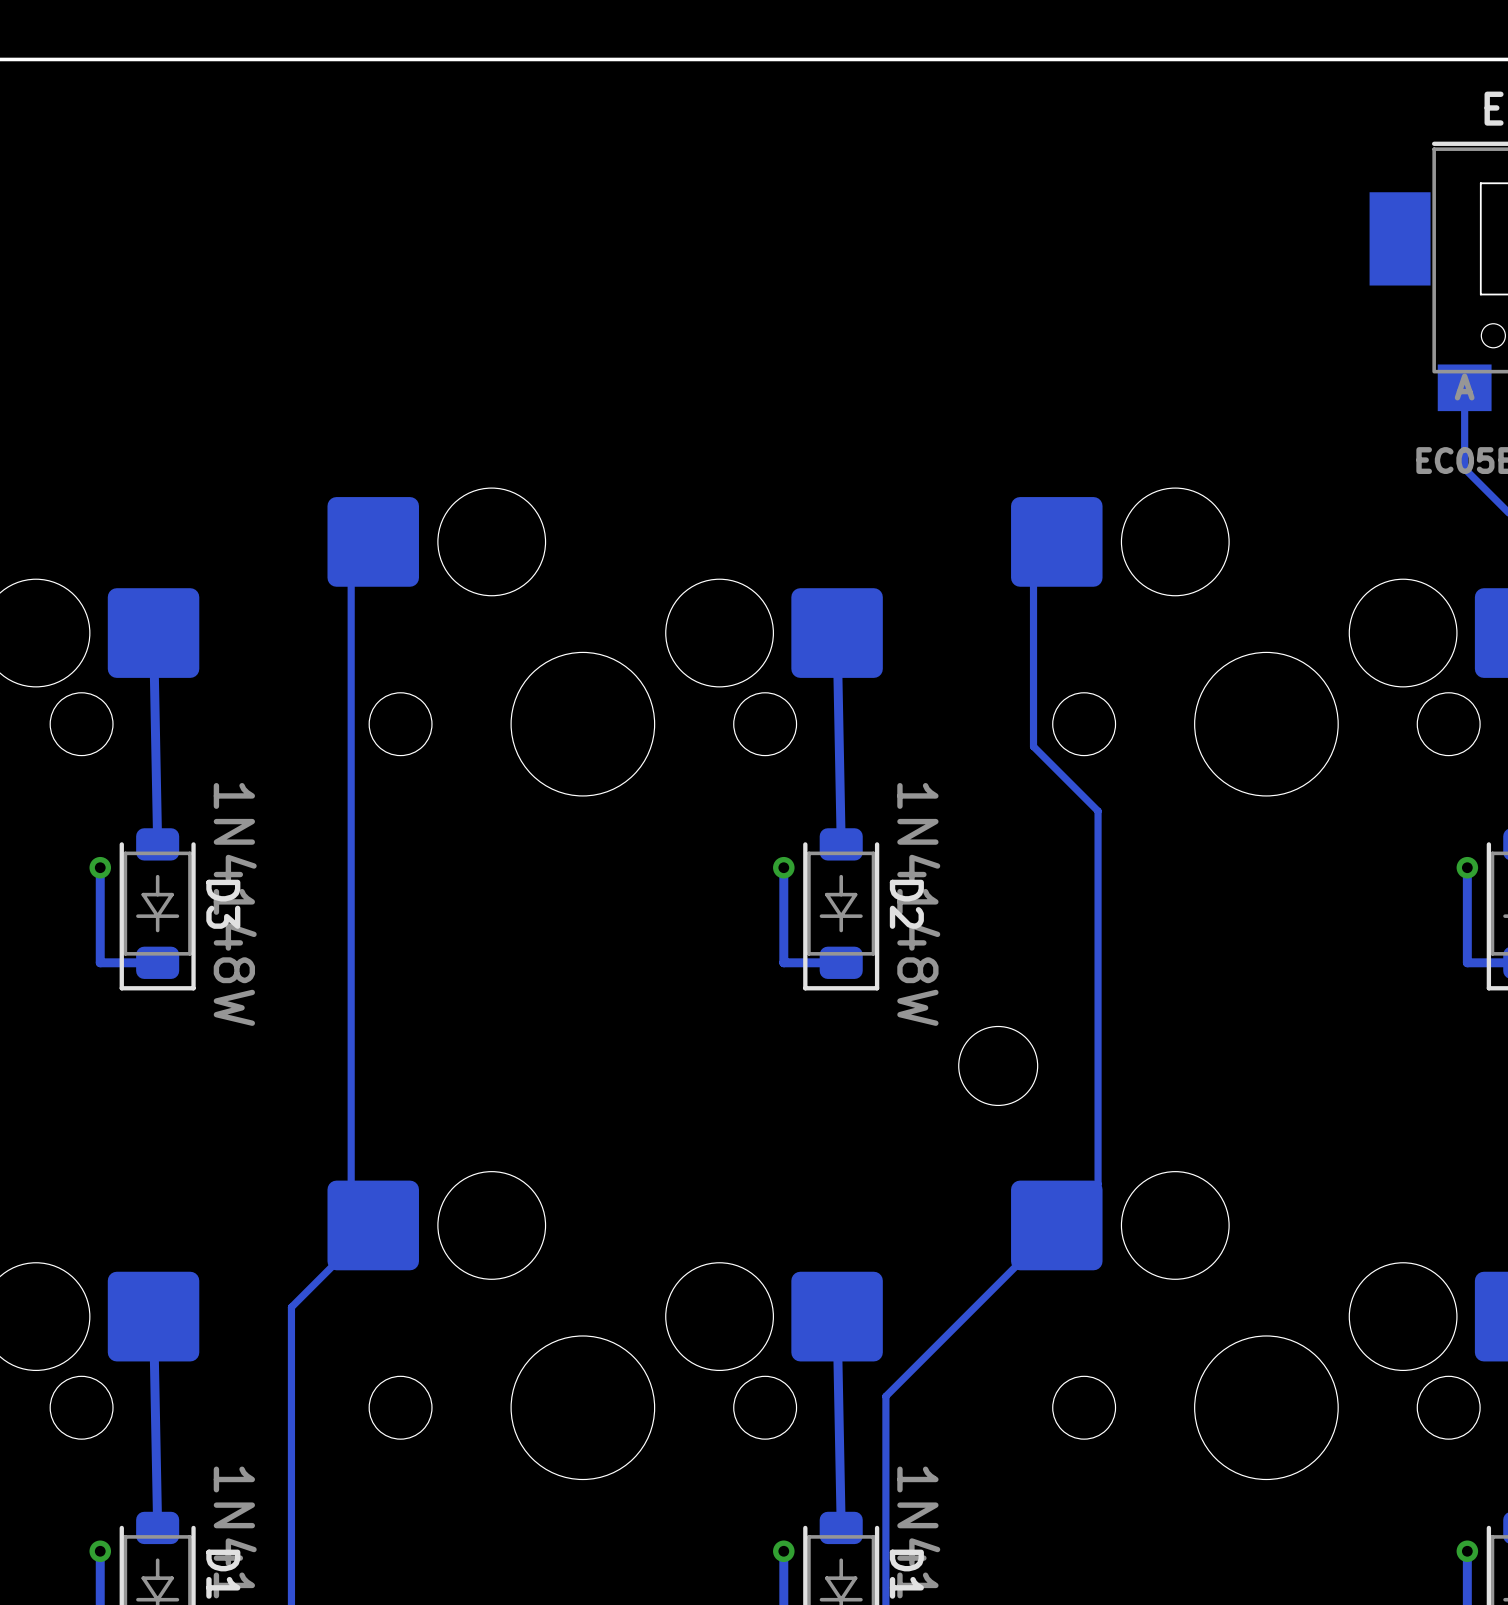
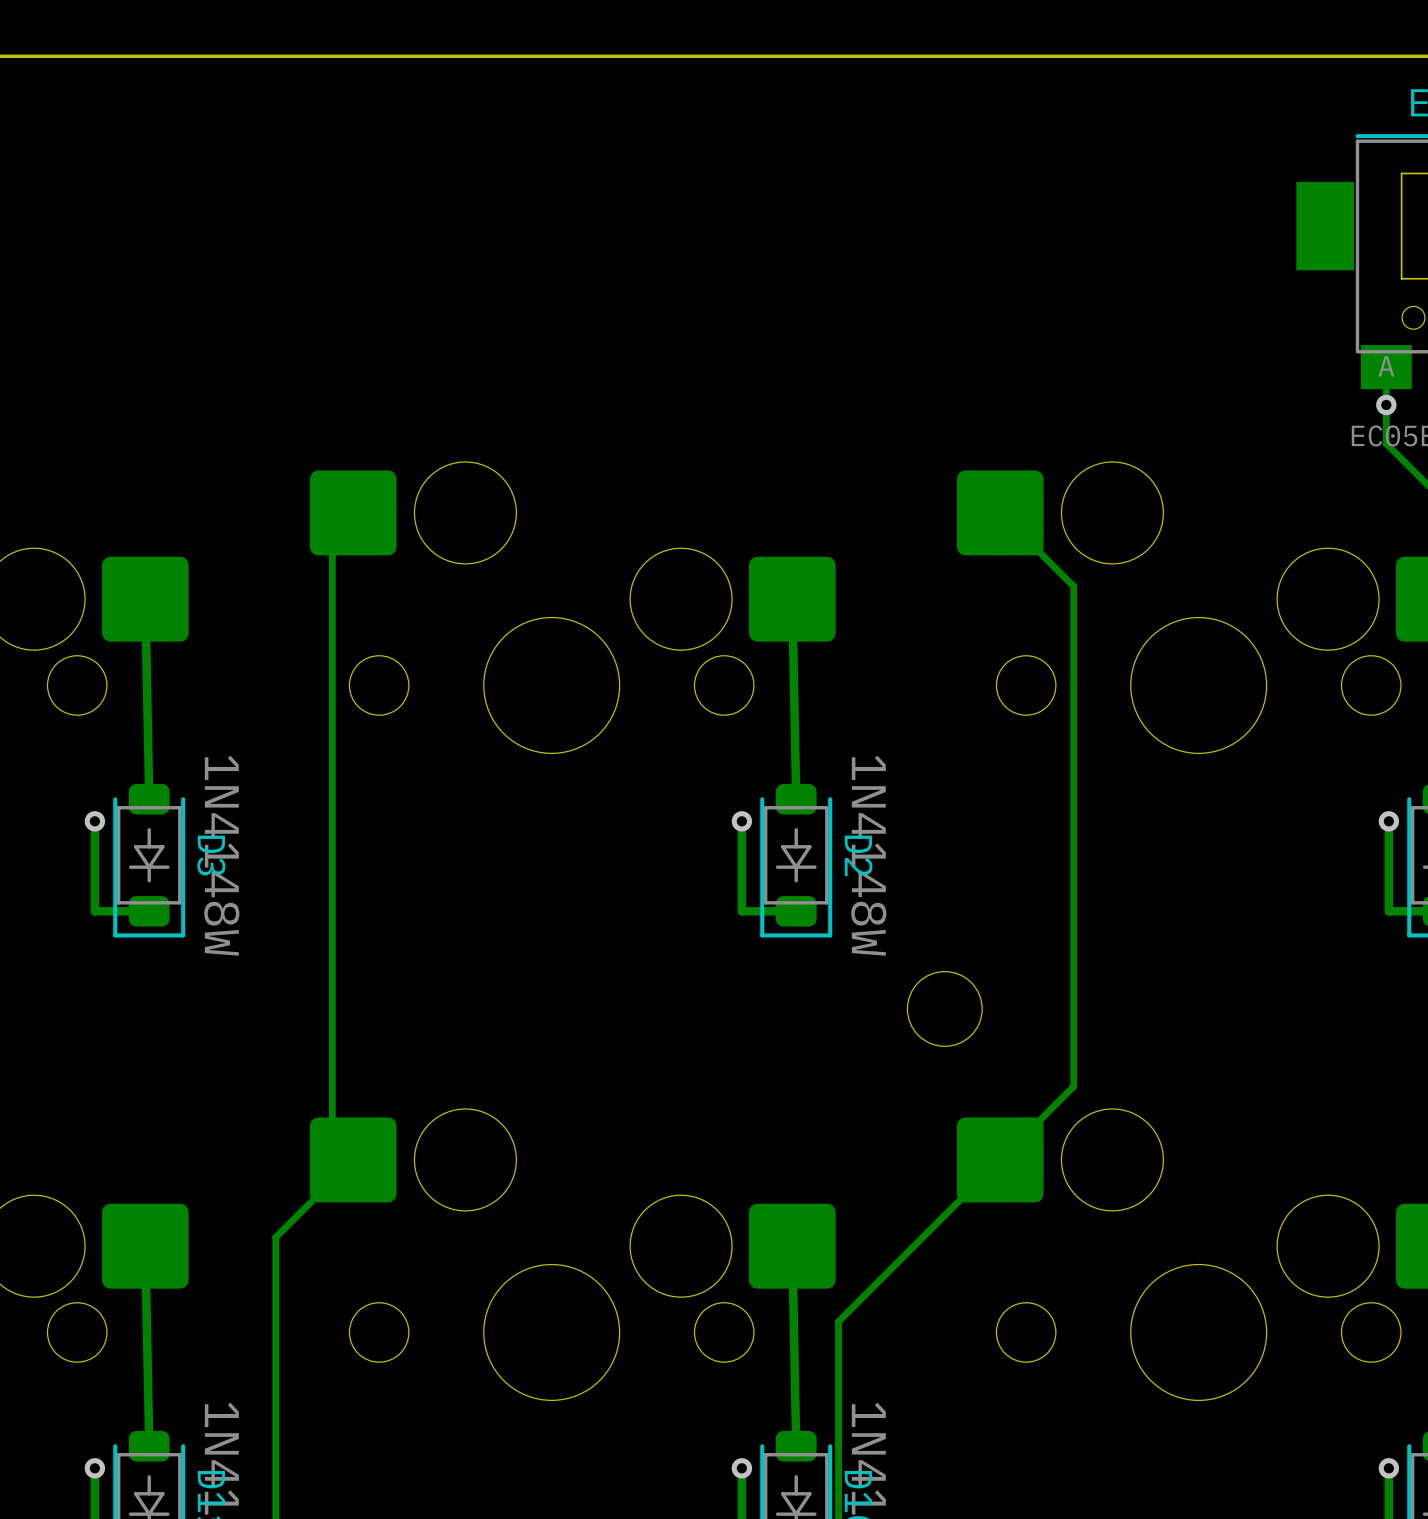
via: none -> (1386, 404)
track: (1056, 541) (1033, 565) (1033, 746) (1098, 811) (1098, 1184) -> (1000, 512) (1073, 586) (1073, 1086) (1039, 1120)

